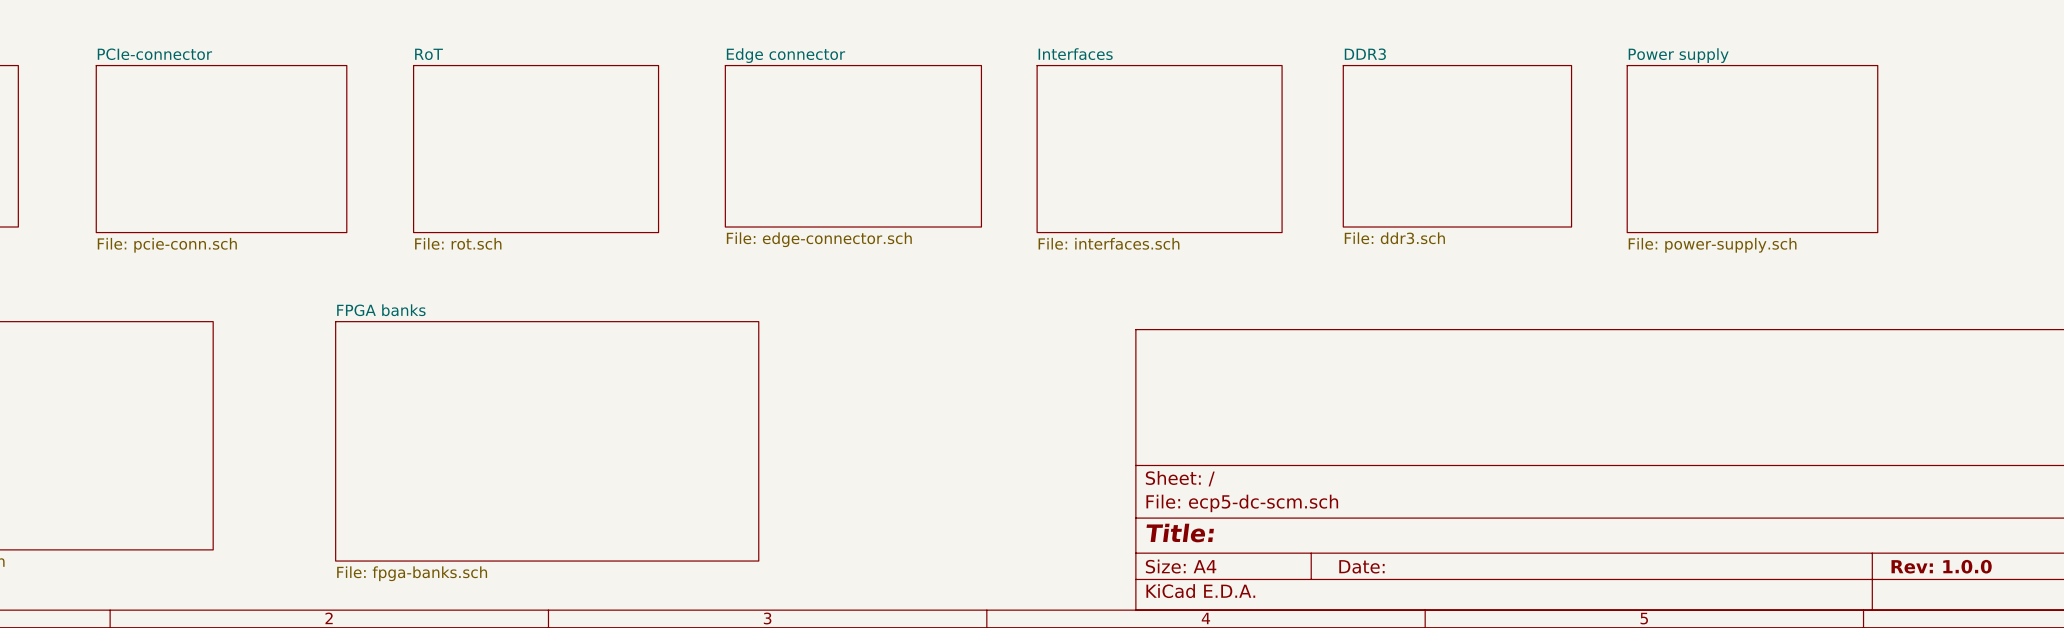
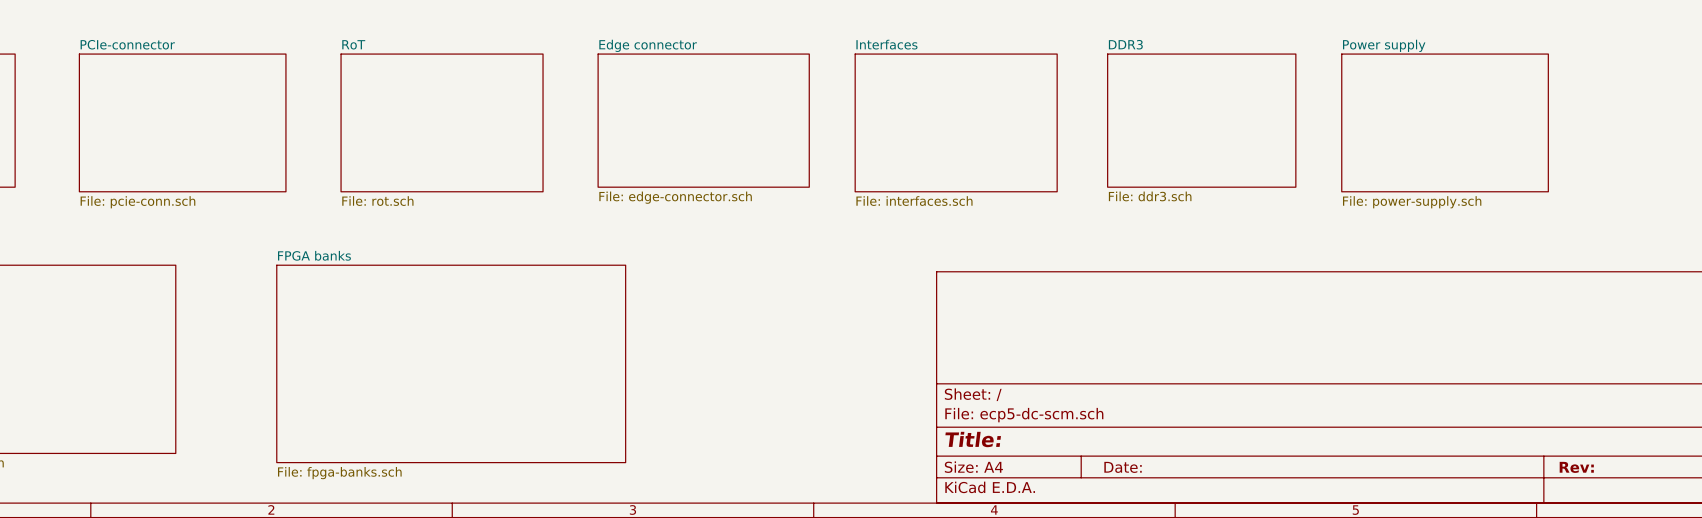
title block: Rev: 1.0.0 (1941, 566) -> Rev: (1576, 467)

